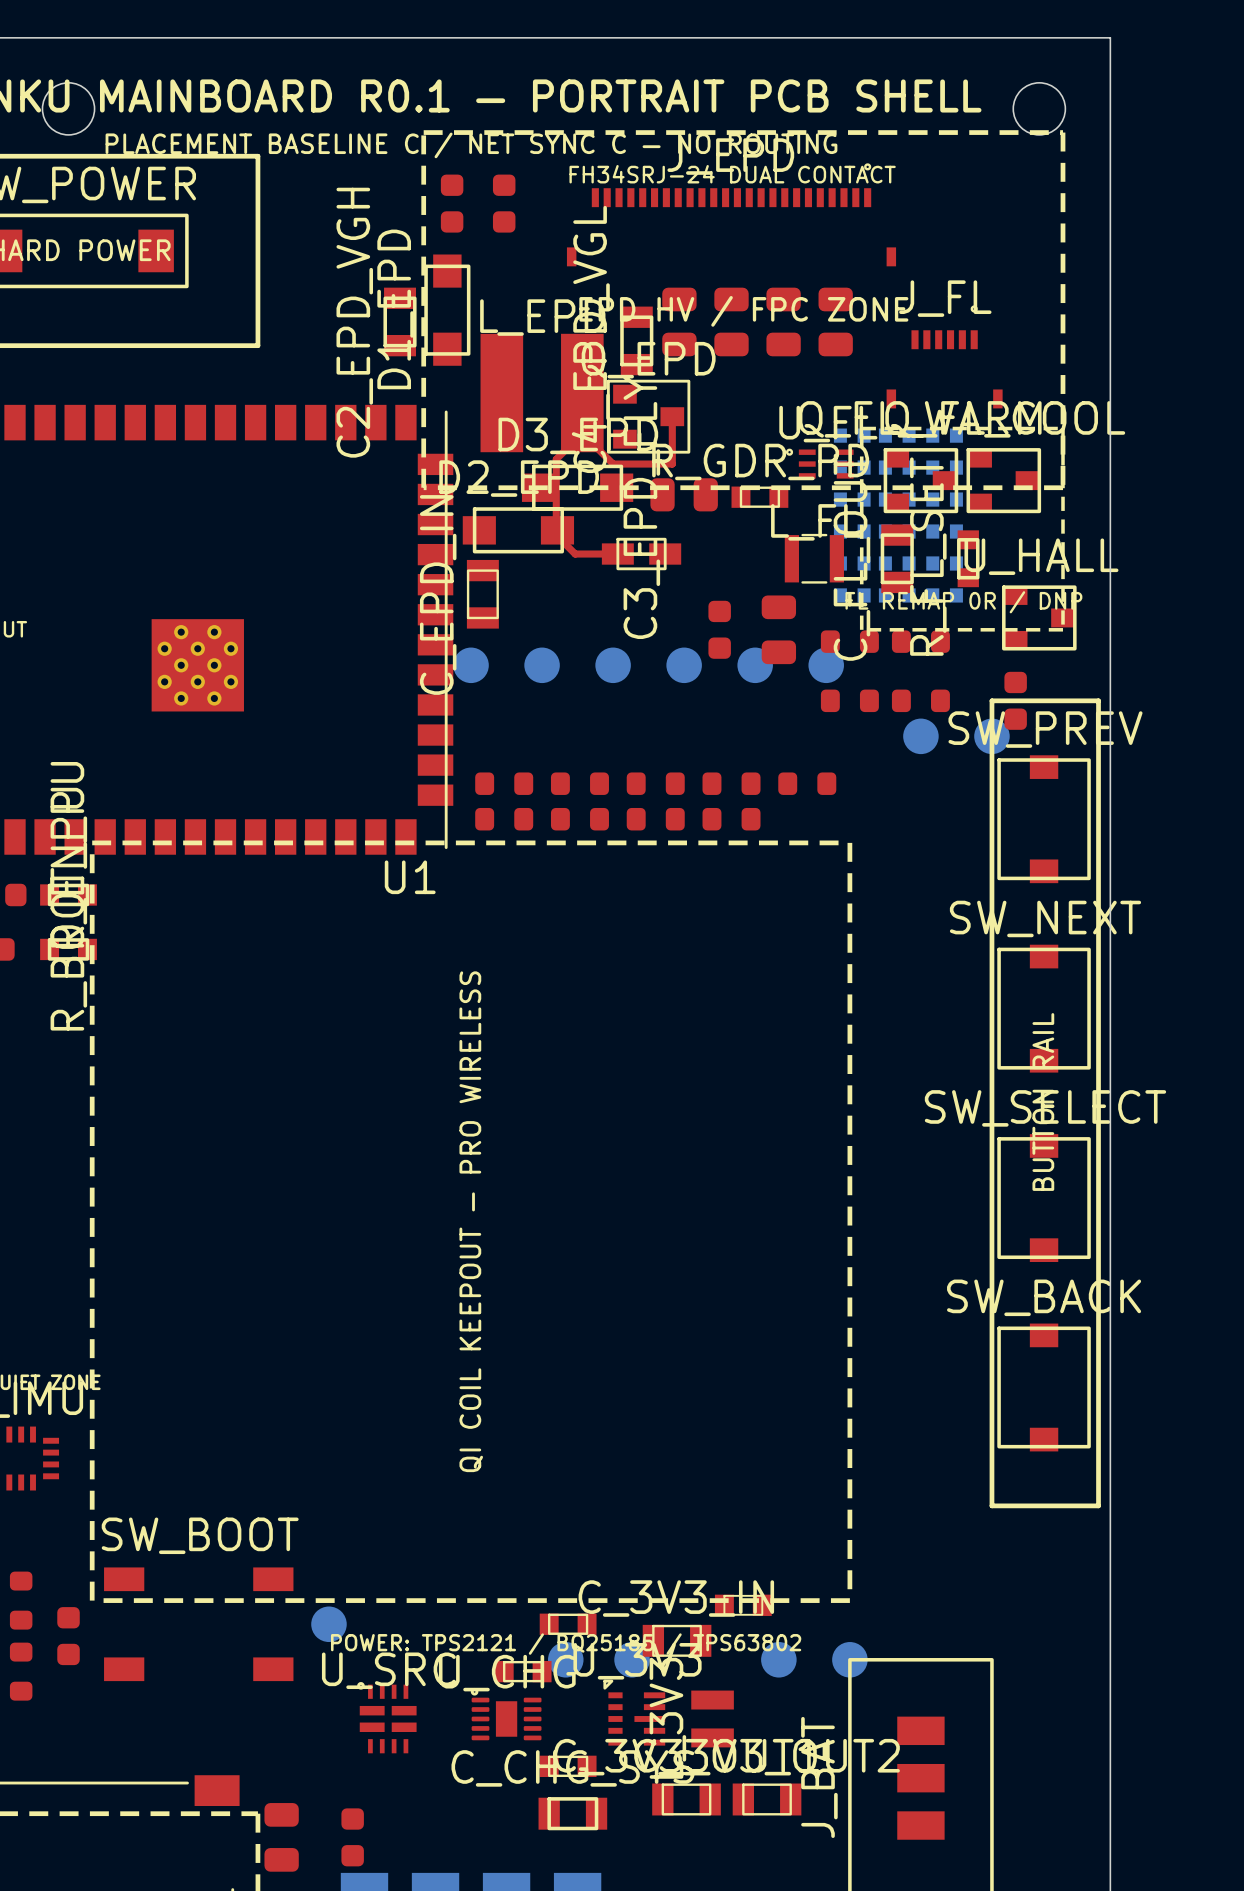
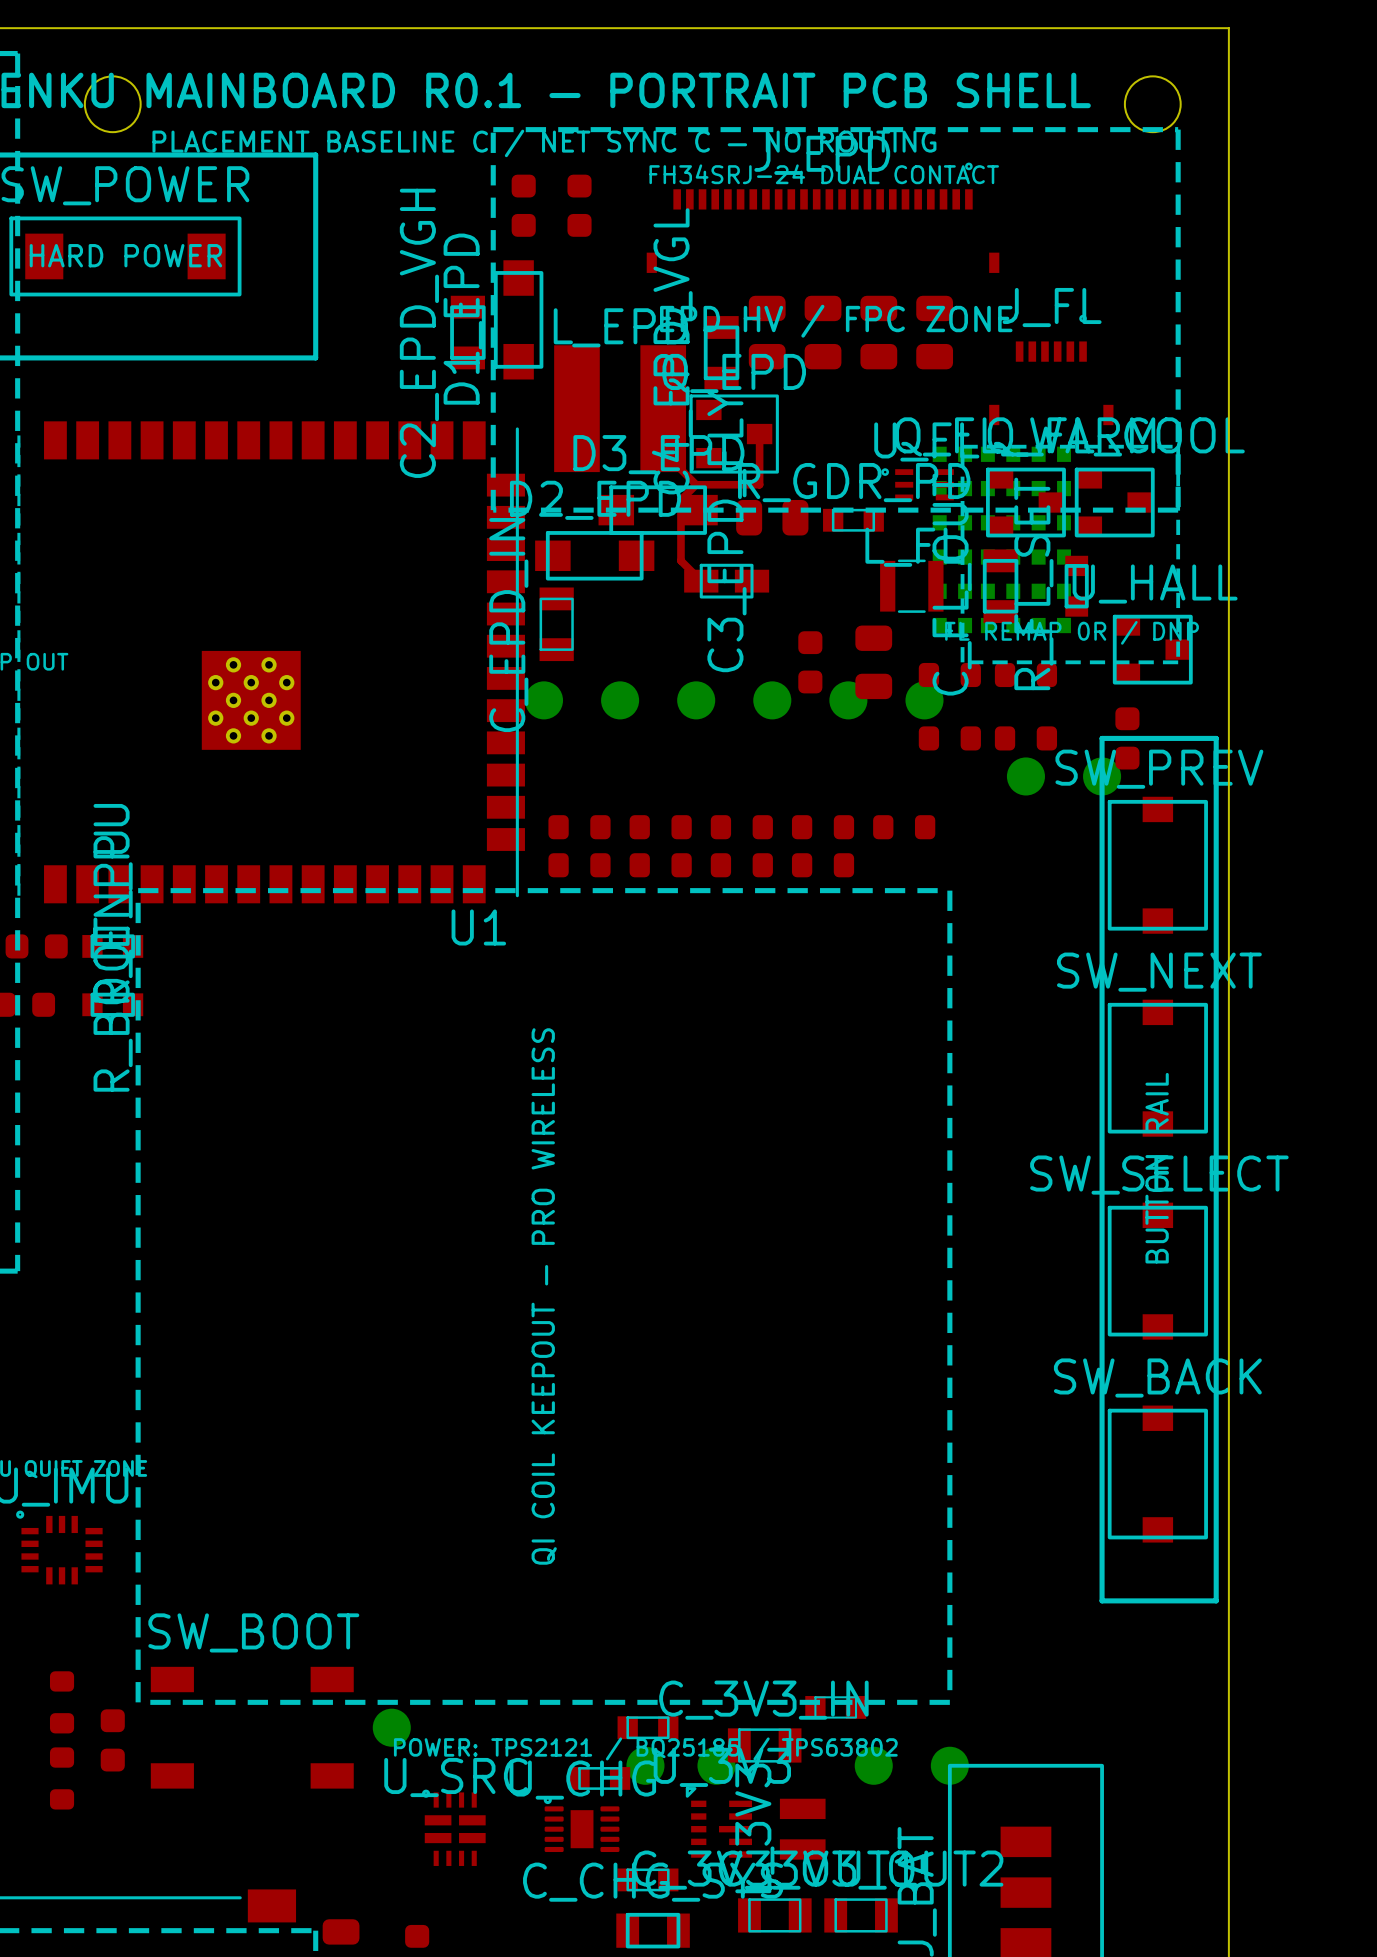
top track: (582, 433) (556, 459) (556, 535) (575, 554) (617, 554) -> (696, 484) (680, 499) (680, 560) (701, 581)

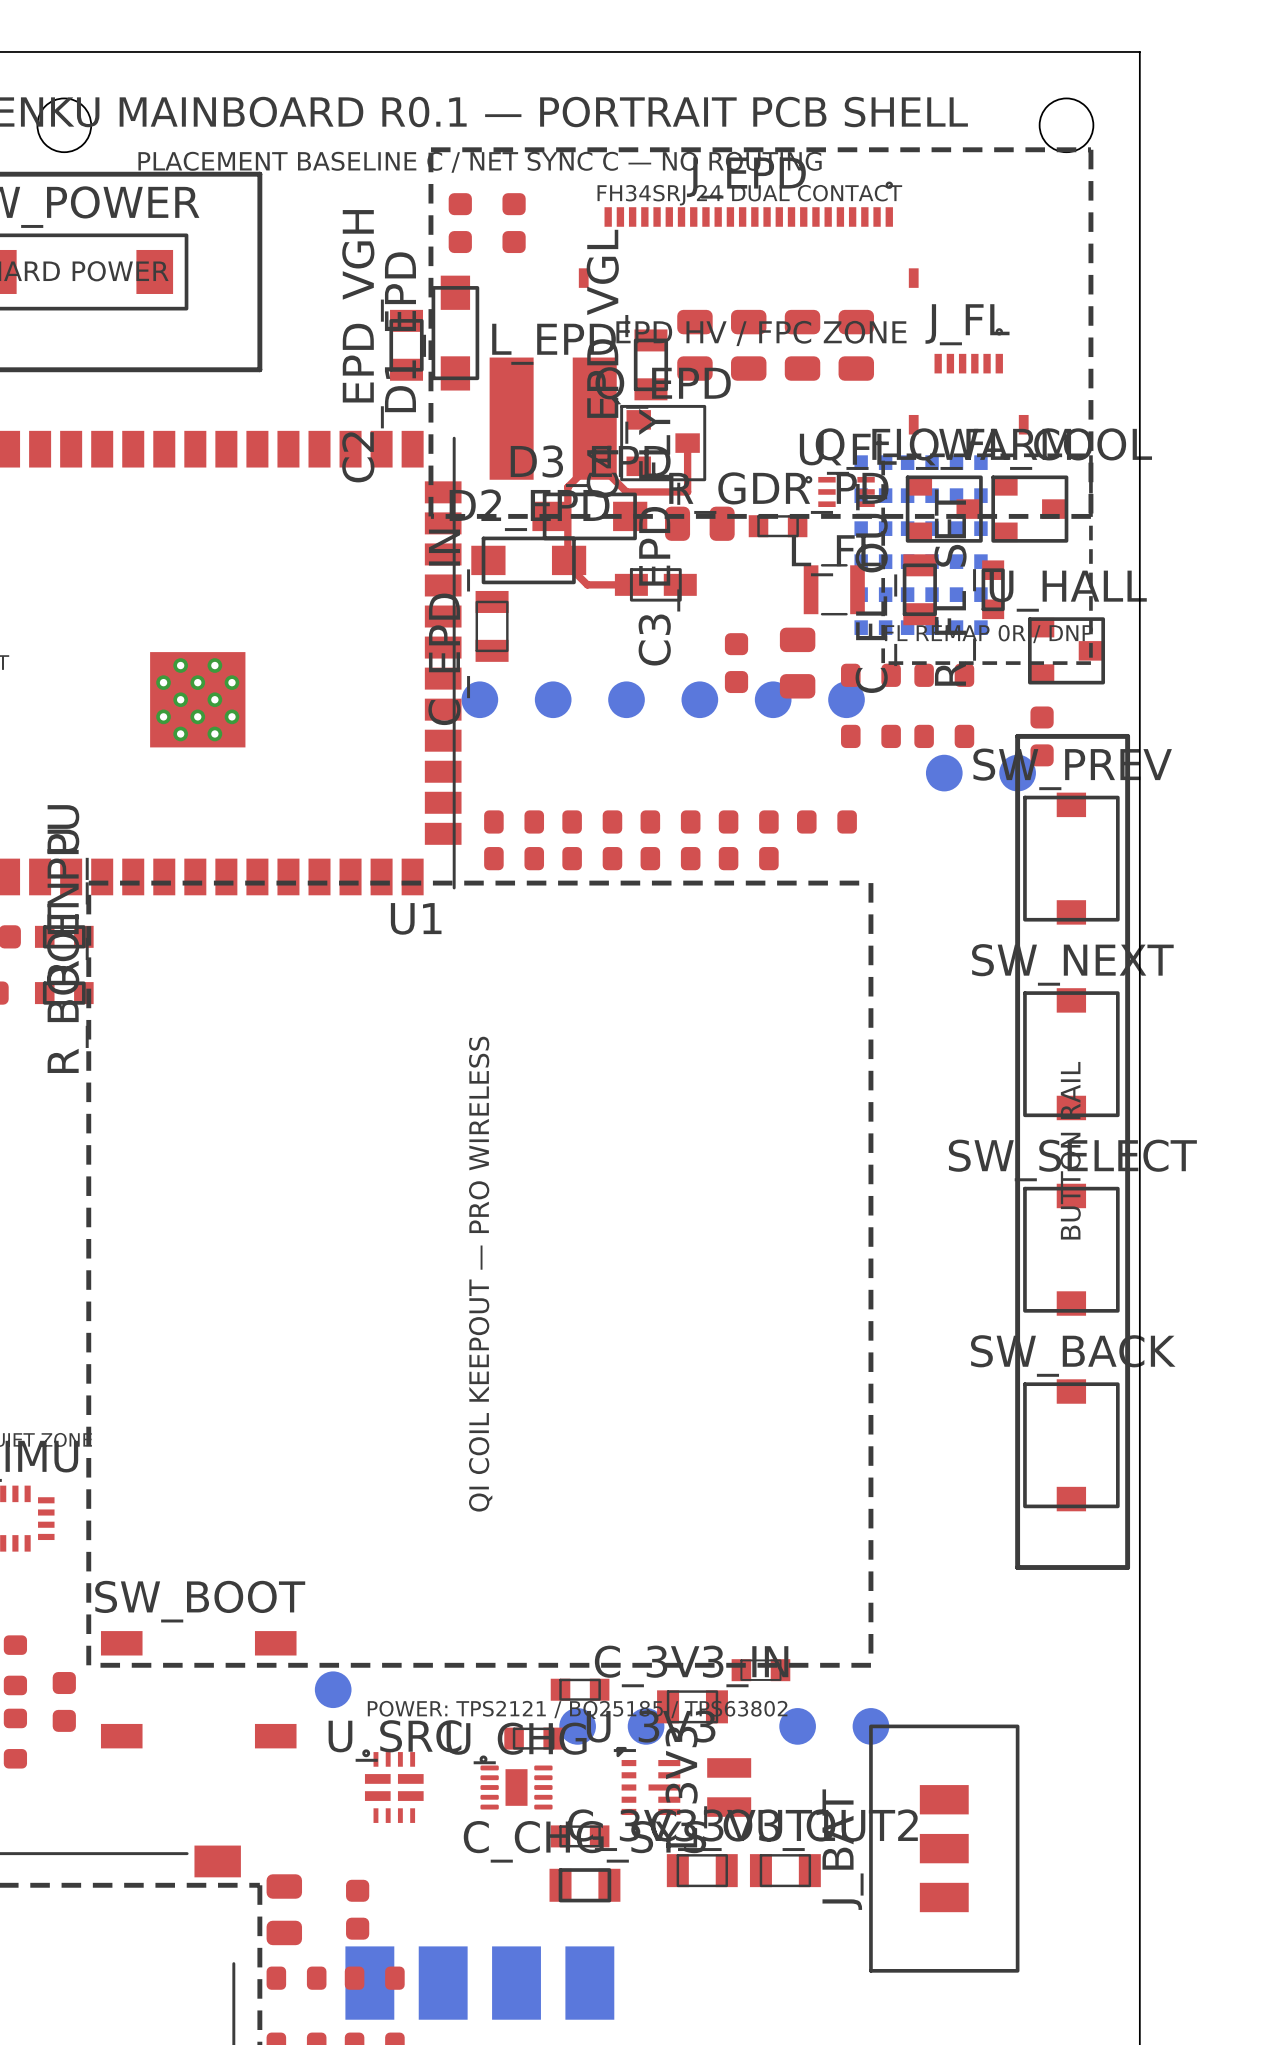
top track: (696, 484) (680, 499) (680, 560) (701, 581) -> (594, 460) (567, 487) (567, 565) (587, 584) (631, 584)

